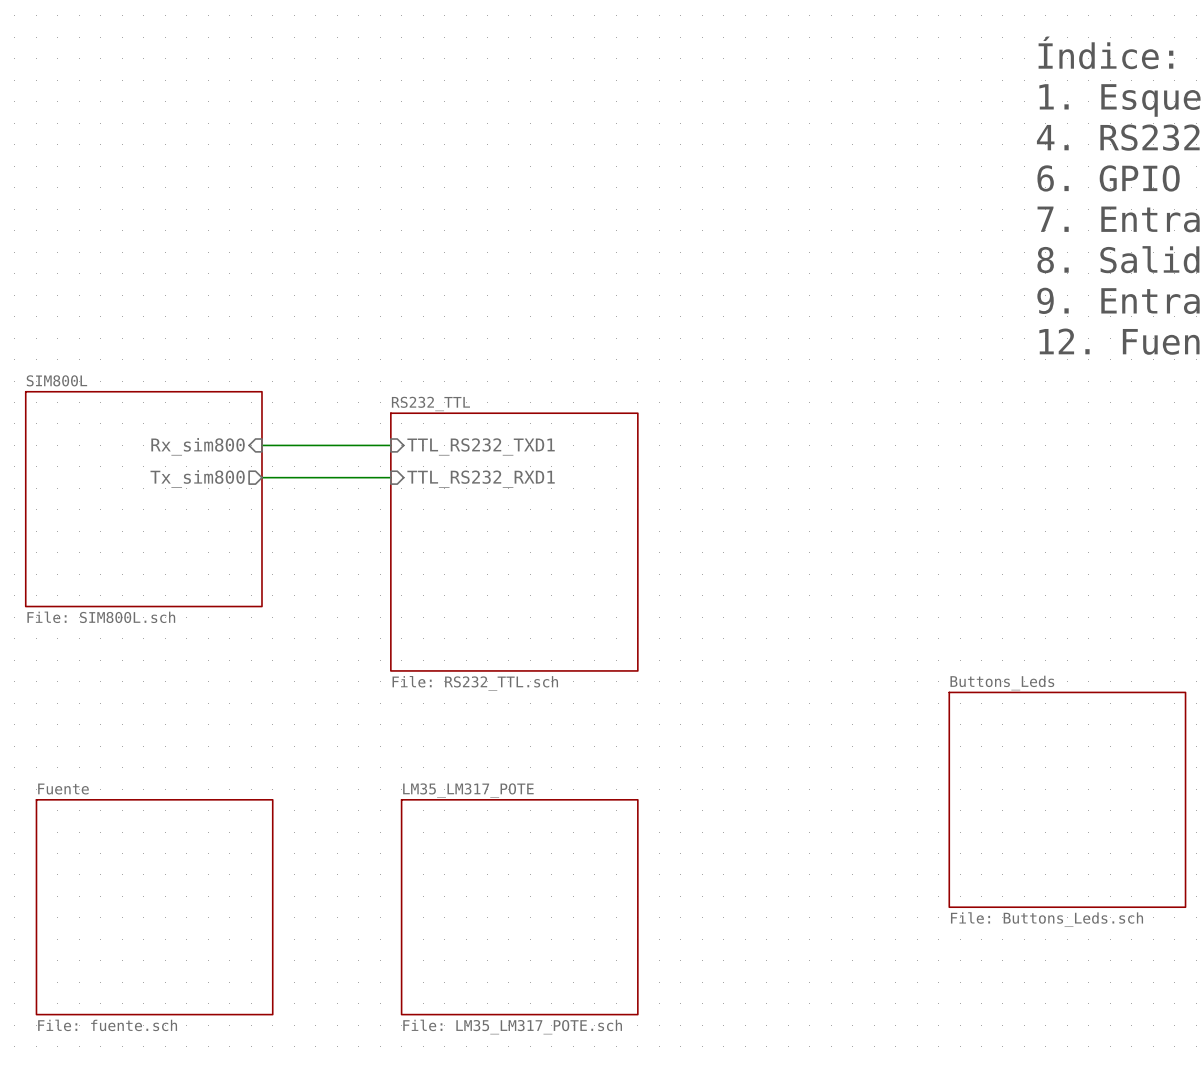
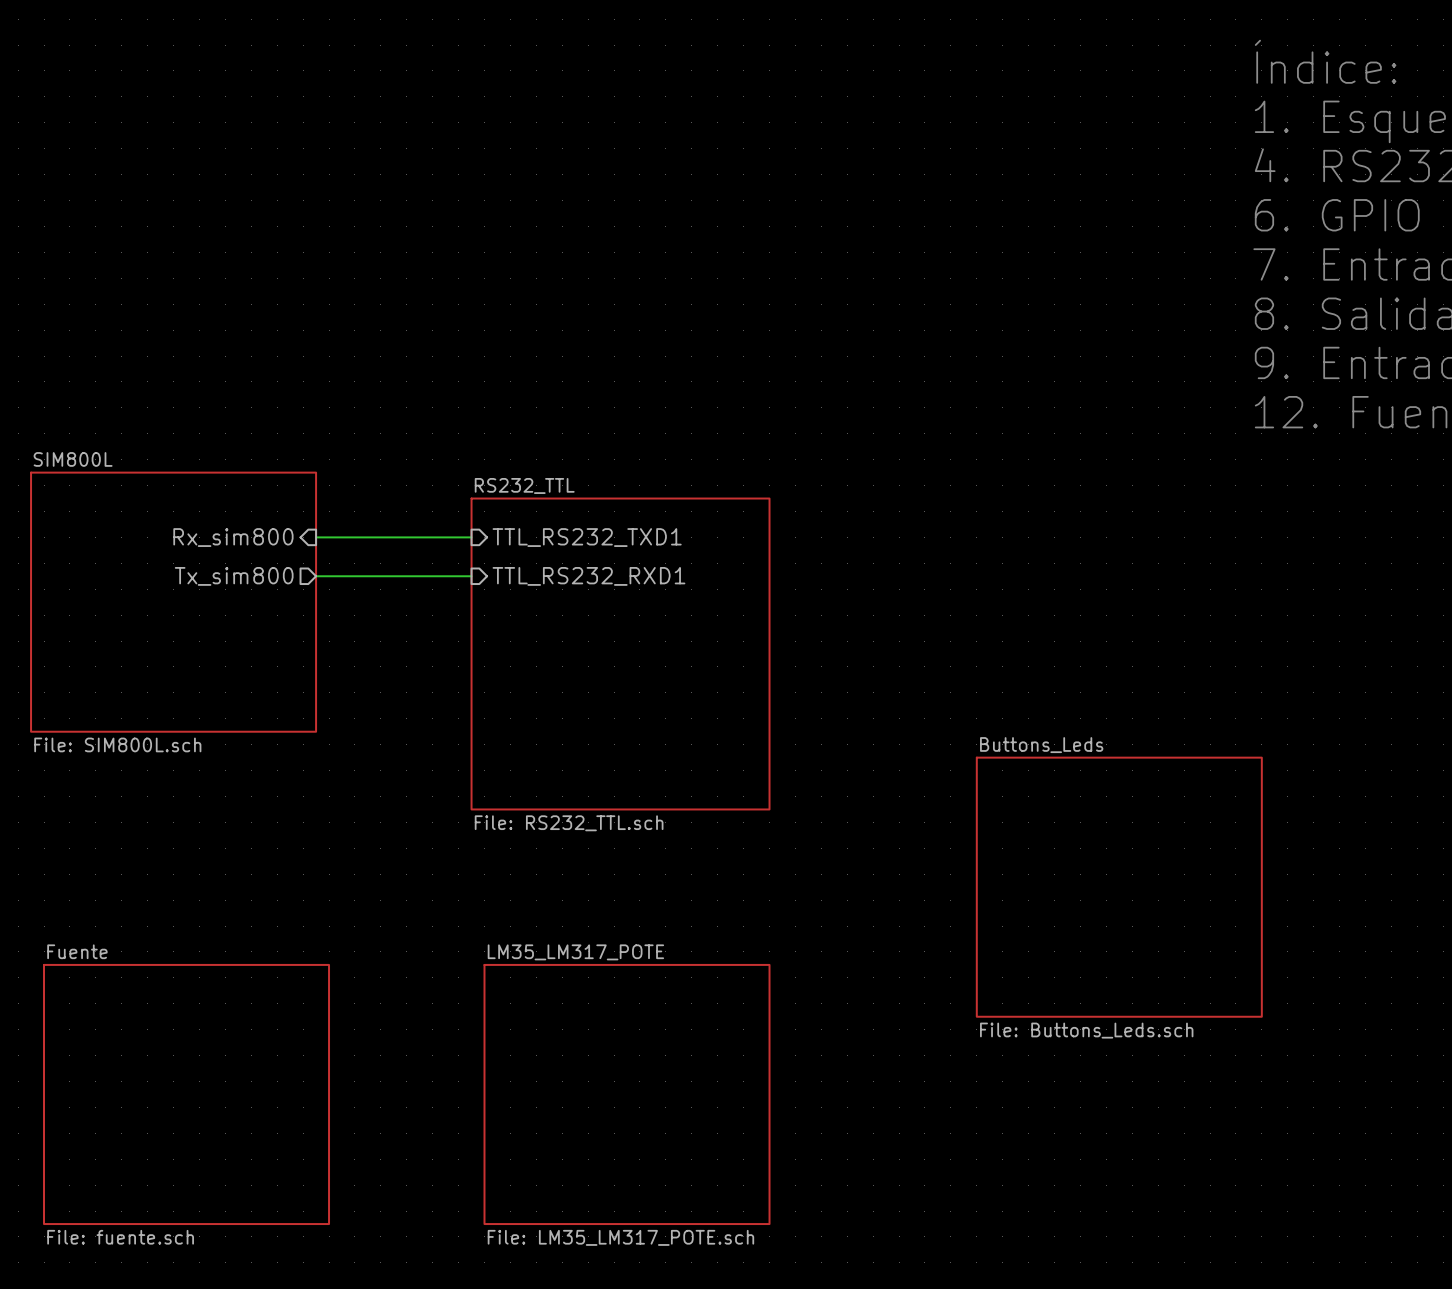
sheet Buttons_Leds position: (1067, 799) -> (1119, 887)

